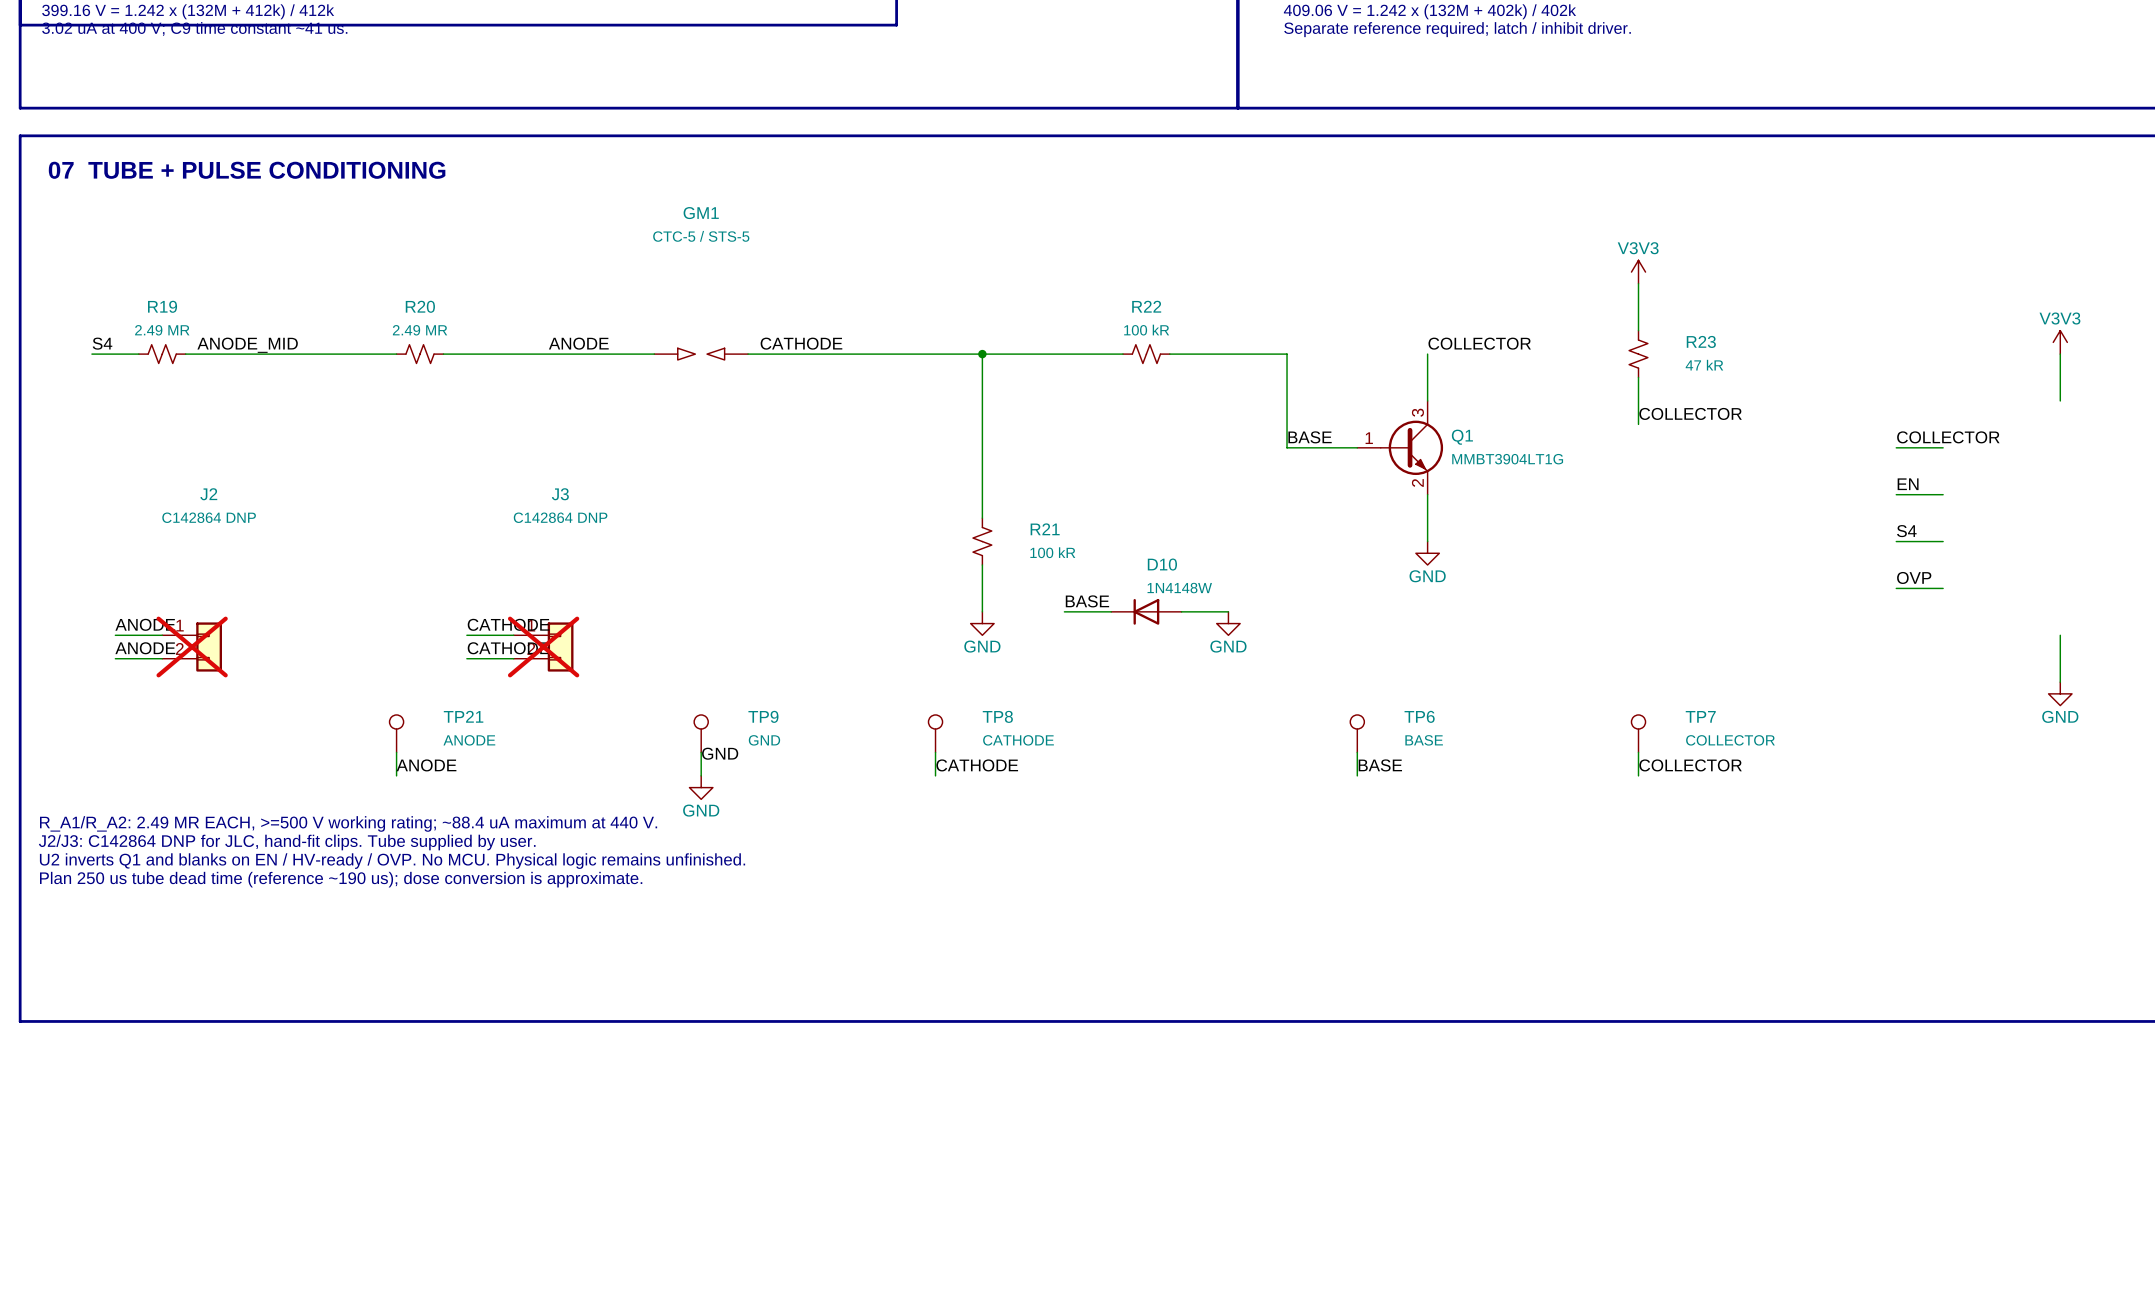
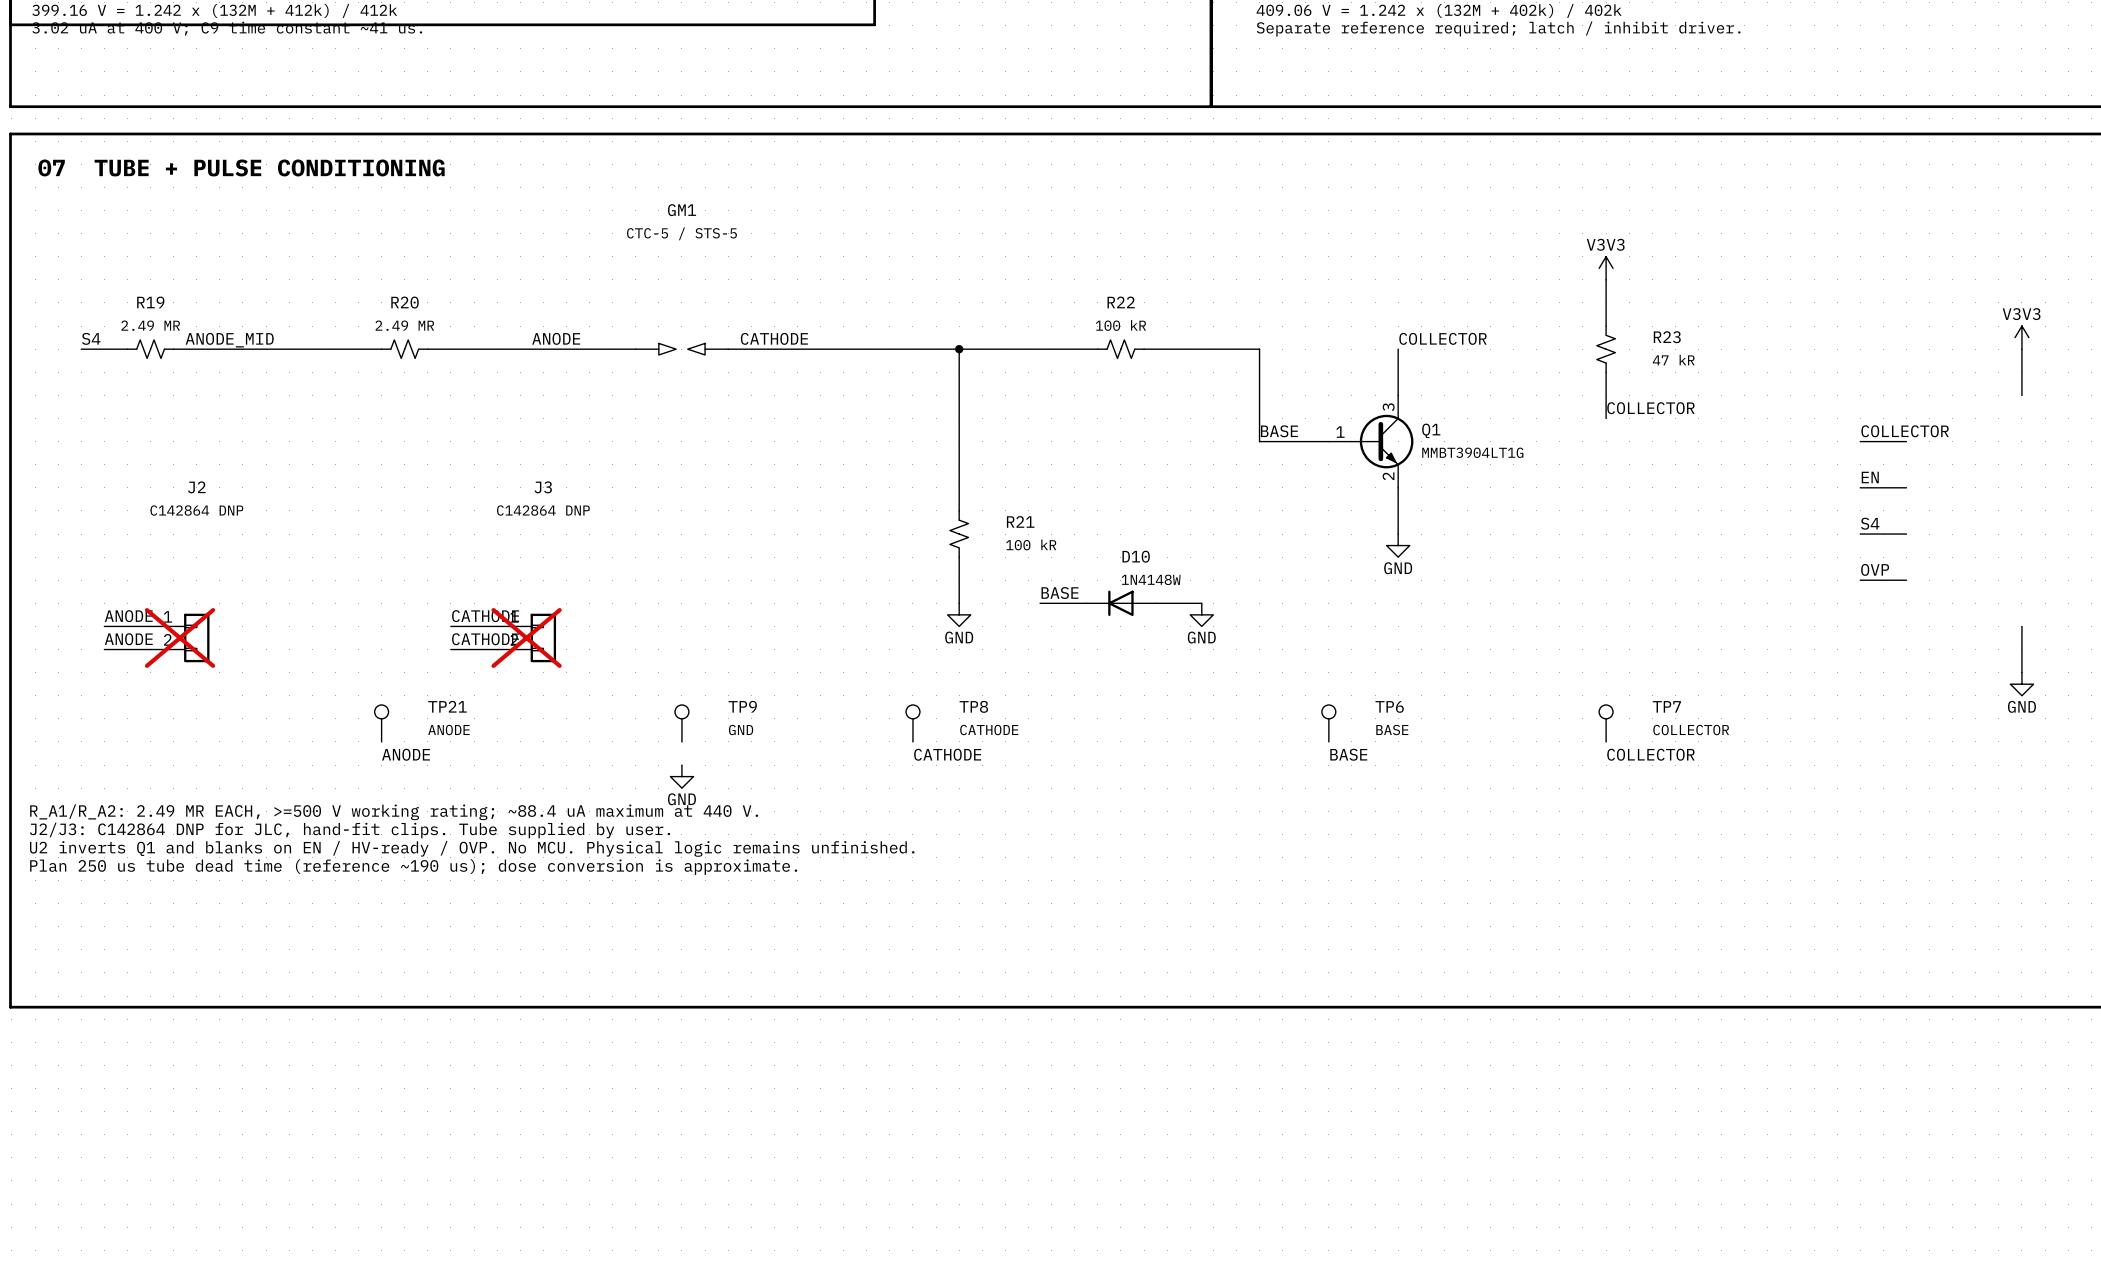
wire: (396, 752) (396, 775) -> none
wire: (701, 752) (701, 775) -> none
wire: (935, 752) (935, 775) -> none
wire: (1357, 752) (1357, 775) -> none
wire: (1638, 752) (1638, 775) -> none
label: GND (720, 753) -> none

